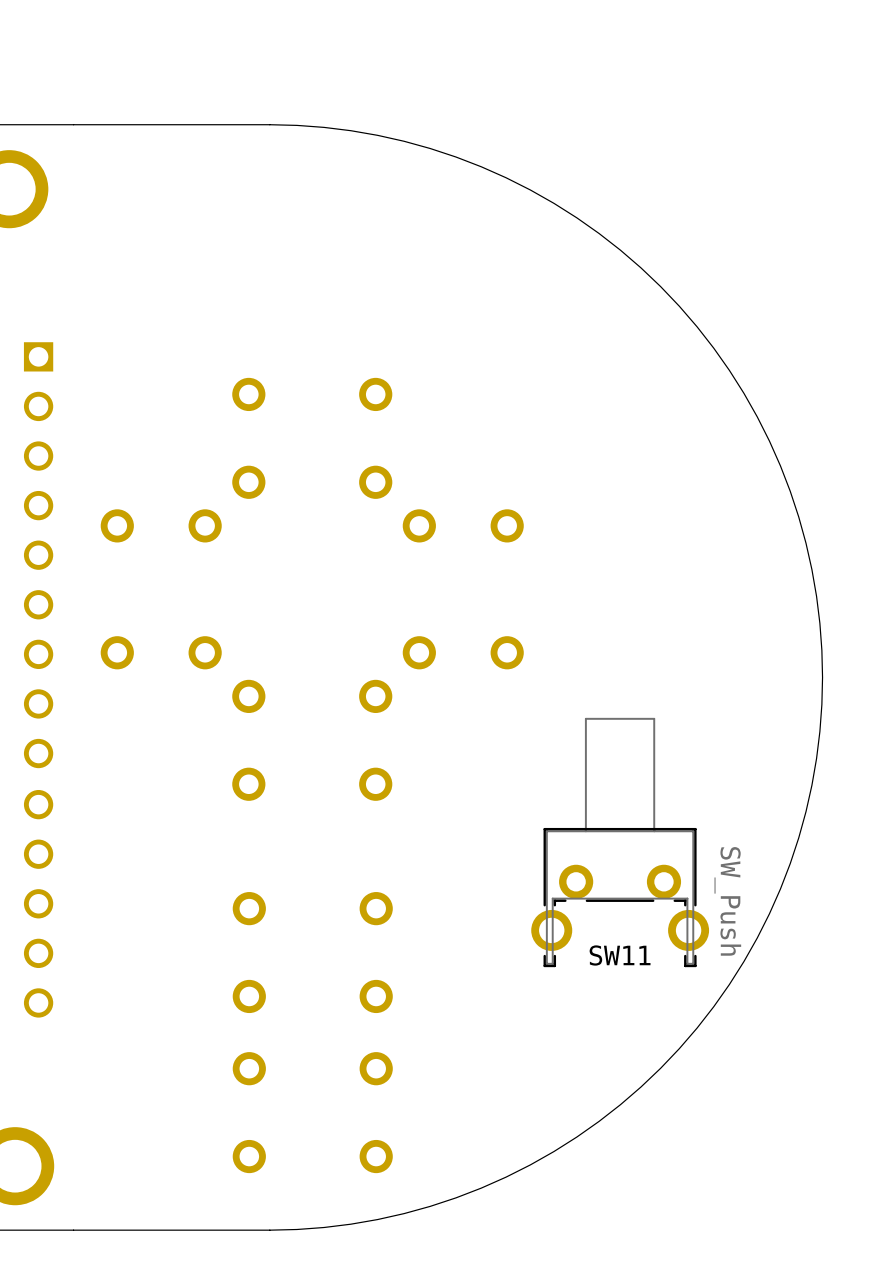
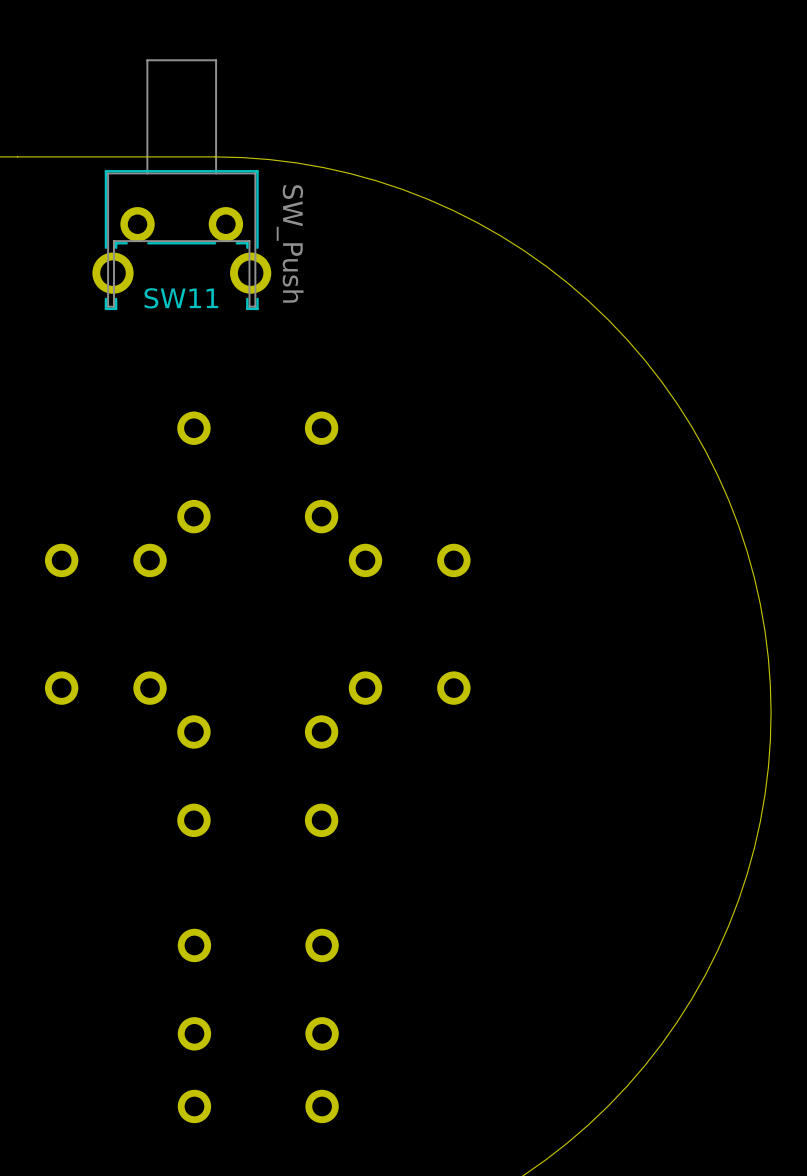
SW11 position: (620, 842) -> (181, 184)

